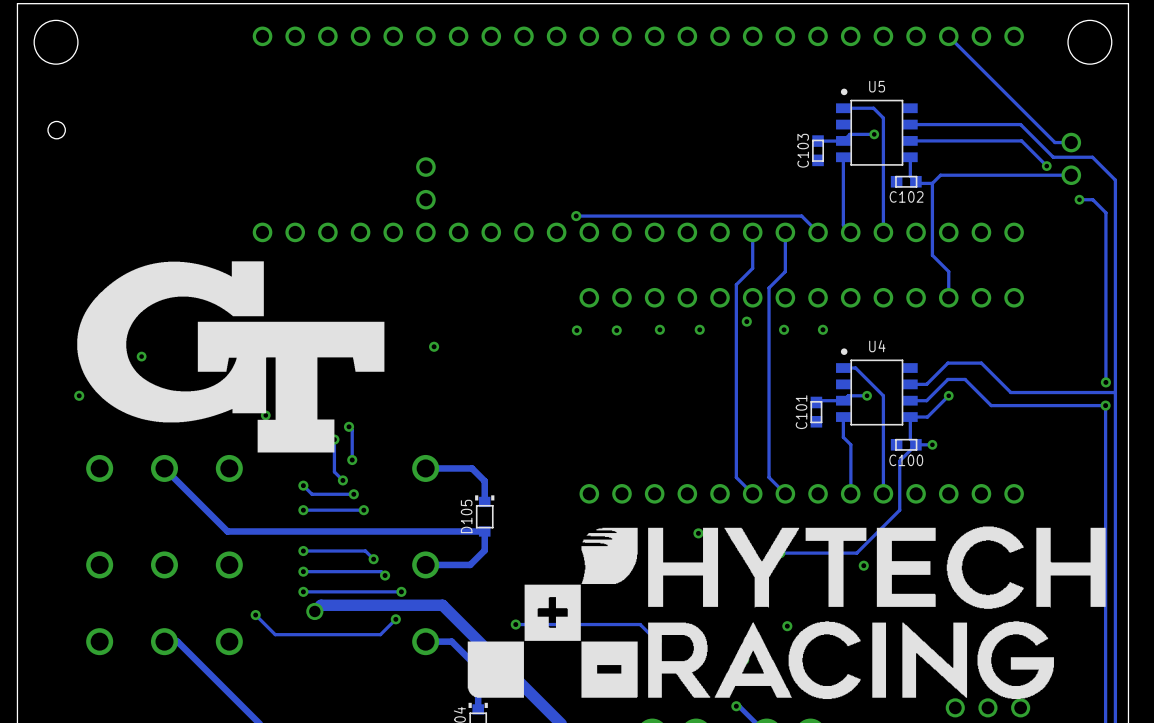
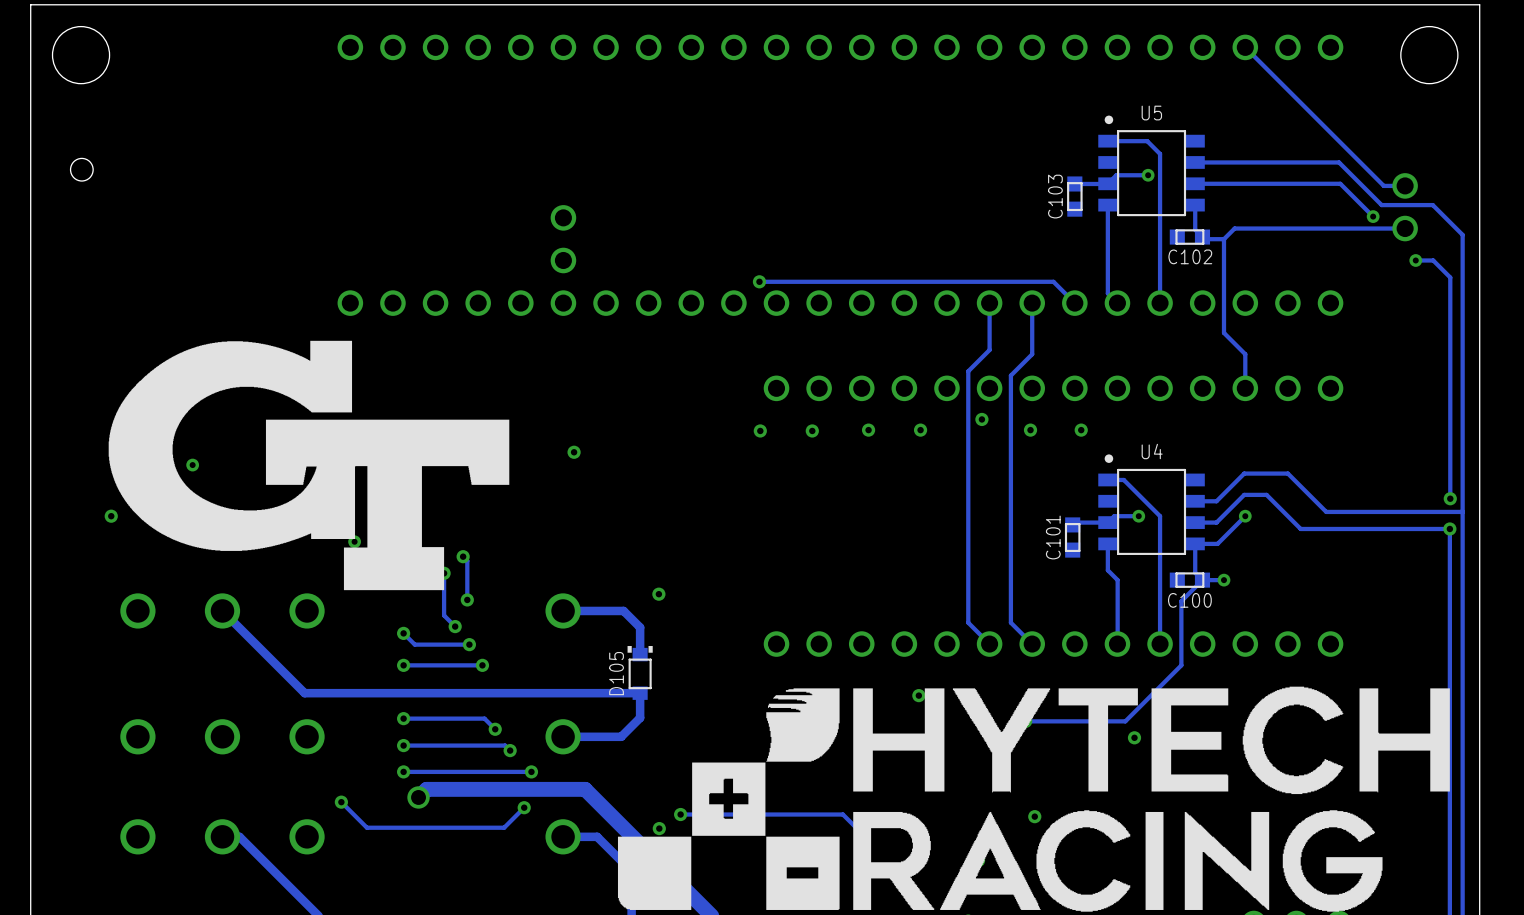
via: none -> (658, 594)
via: none -> (659, 828)

